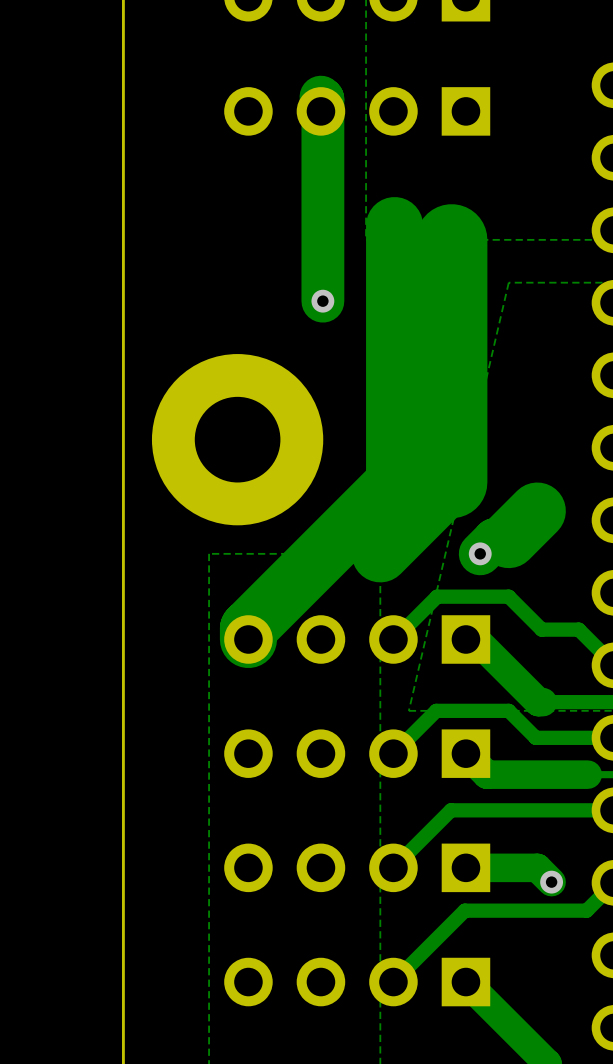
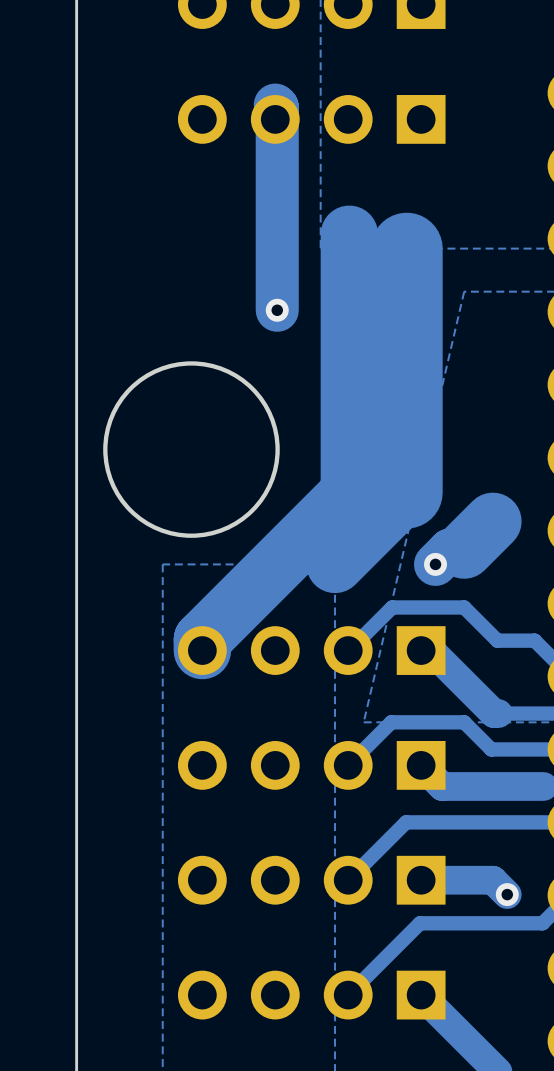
round board edge: none -> [103, 361, 280, 538]
part: (237, 439) -> none

